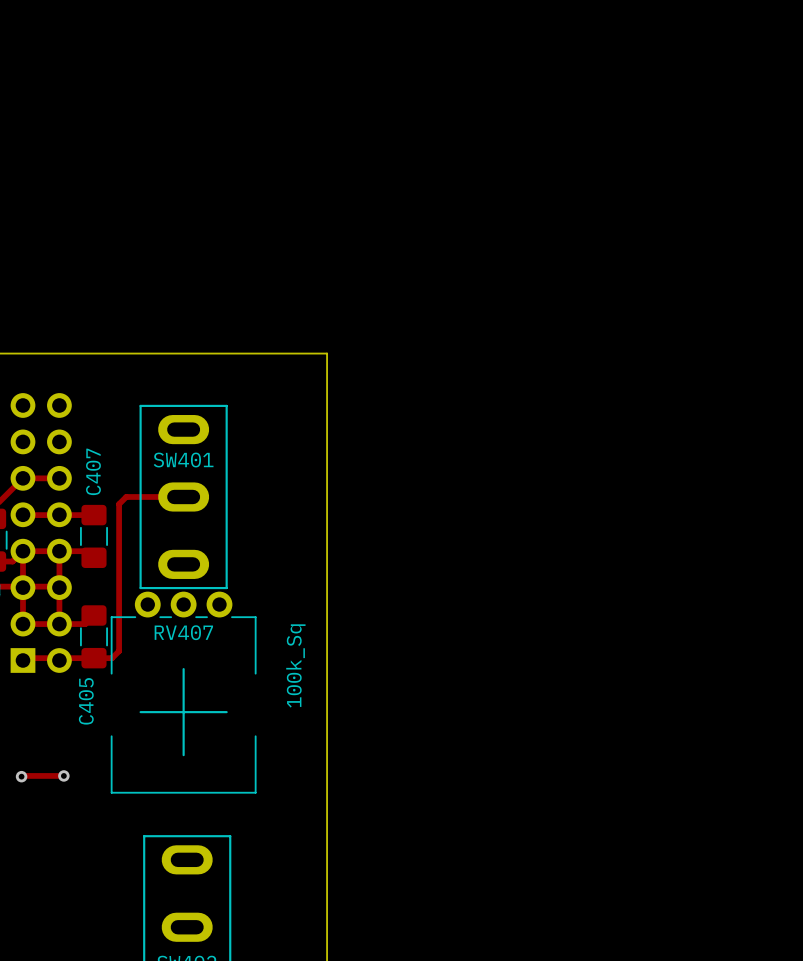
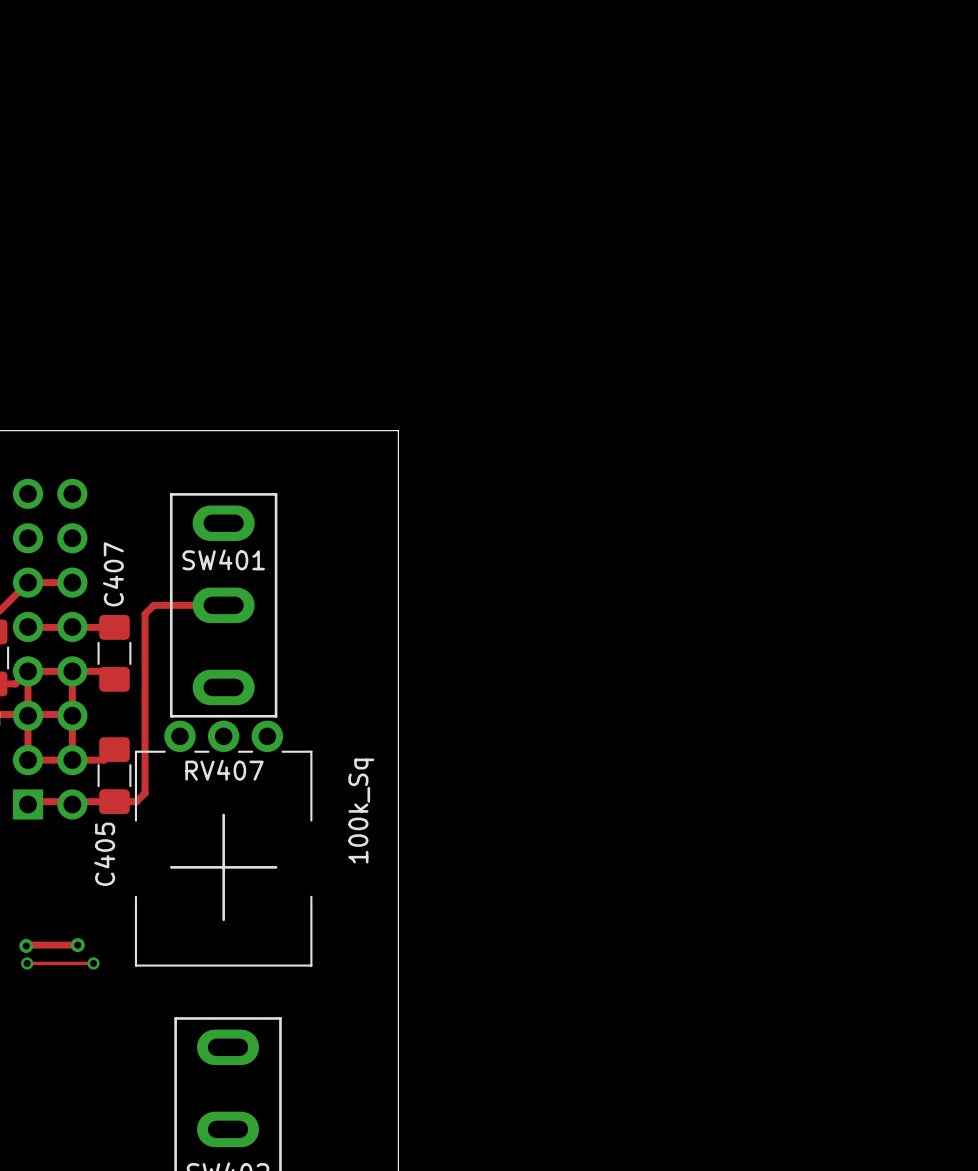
track: none -> (27, 963) (93, 963)
via: none -> (27, 963)
via: none -> (93, 963)

